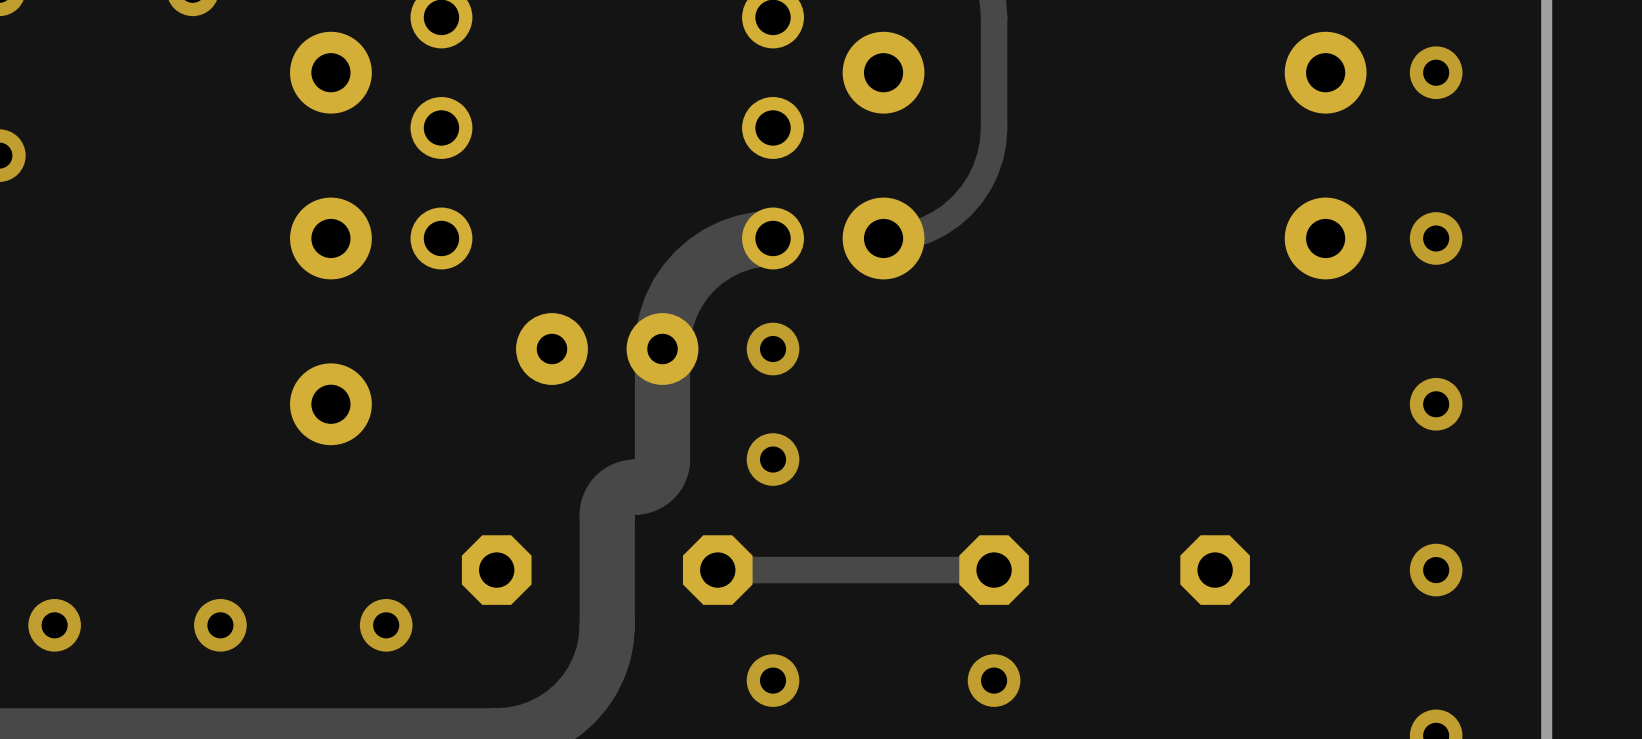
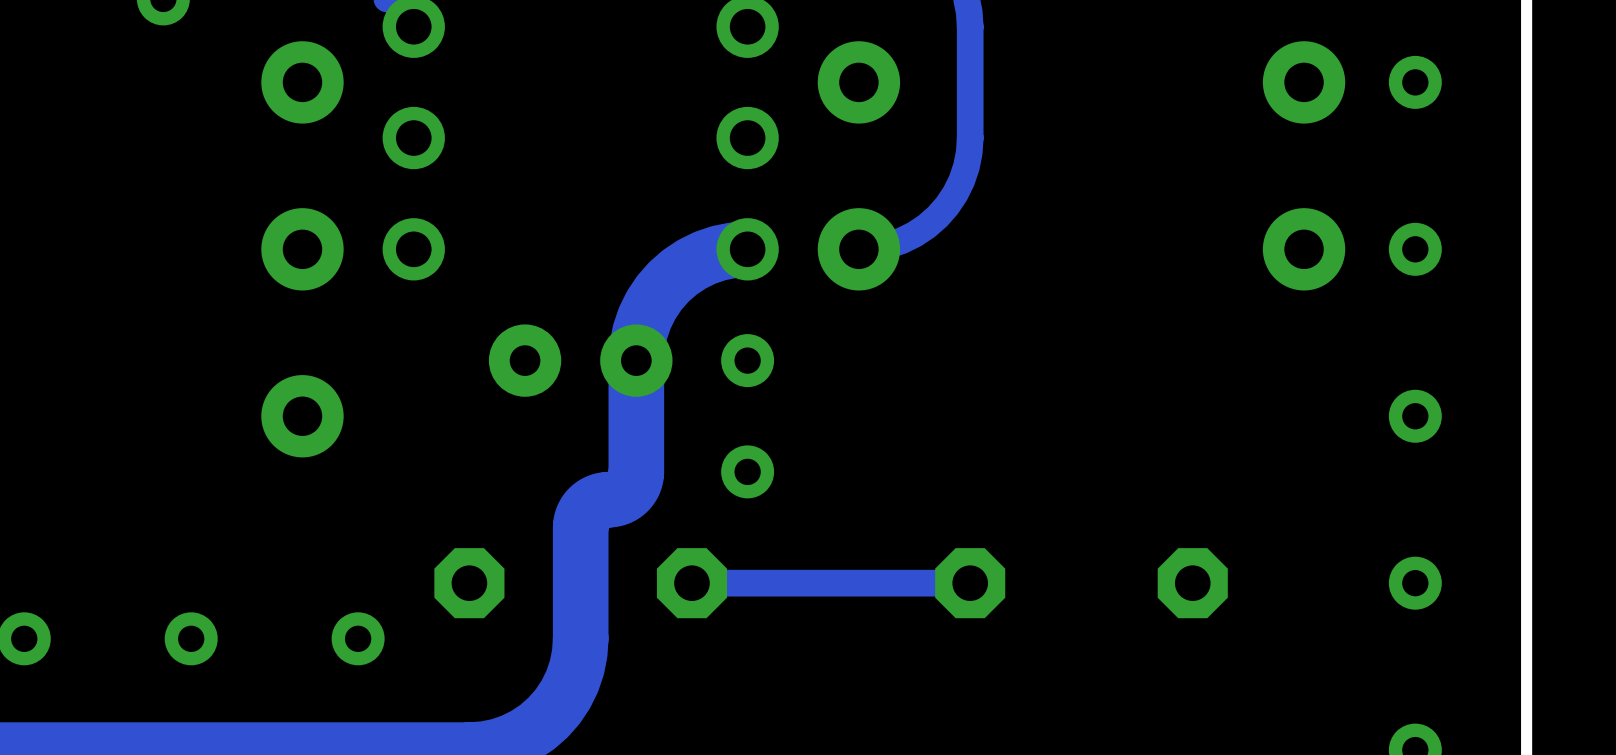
via: (773, 680) -> none
via: (994, 680) -> none

